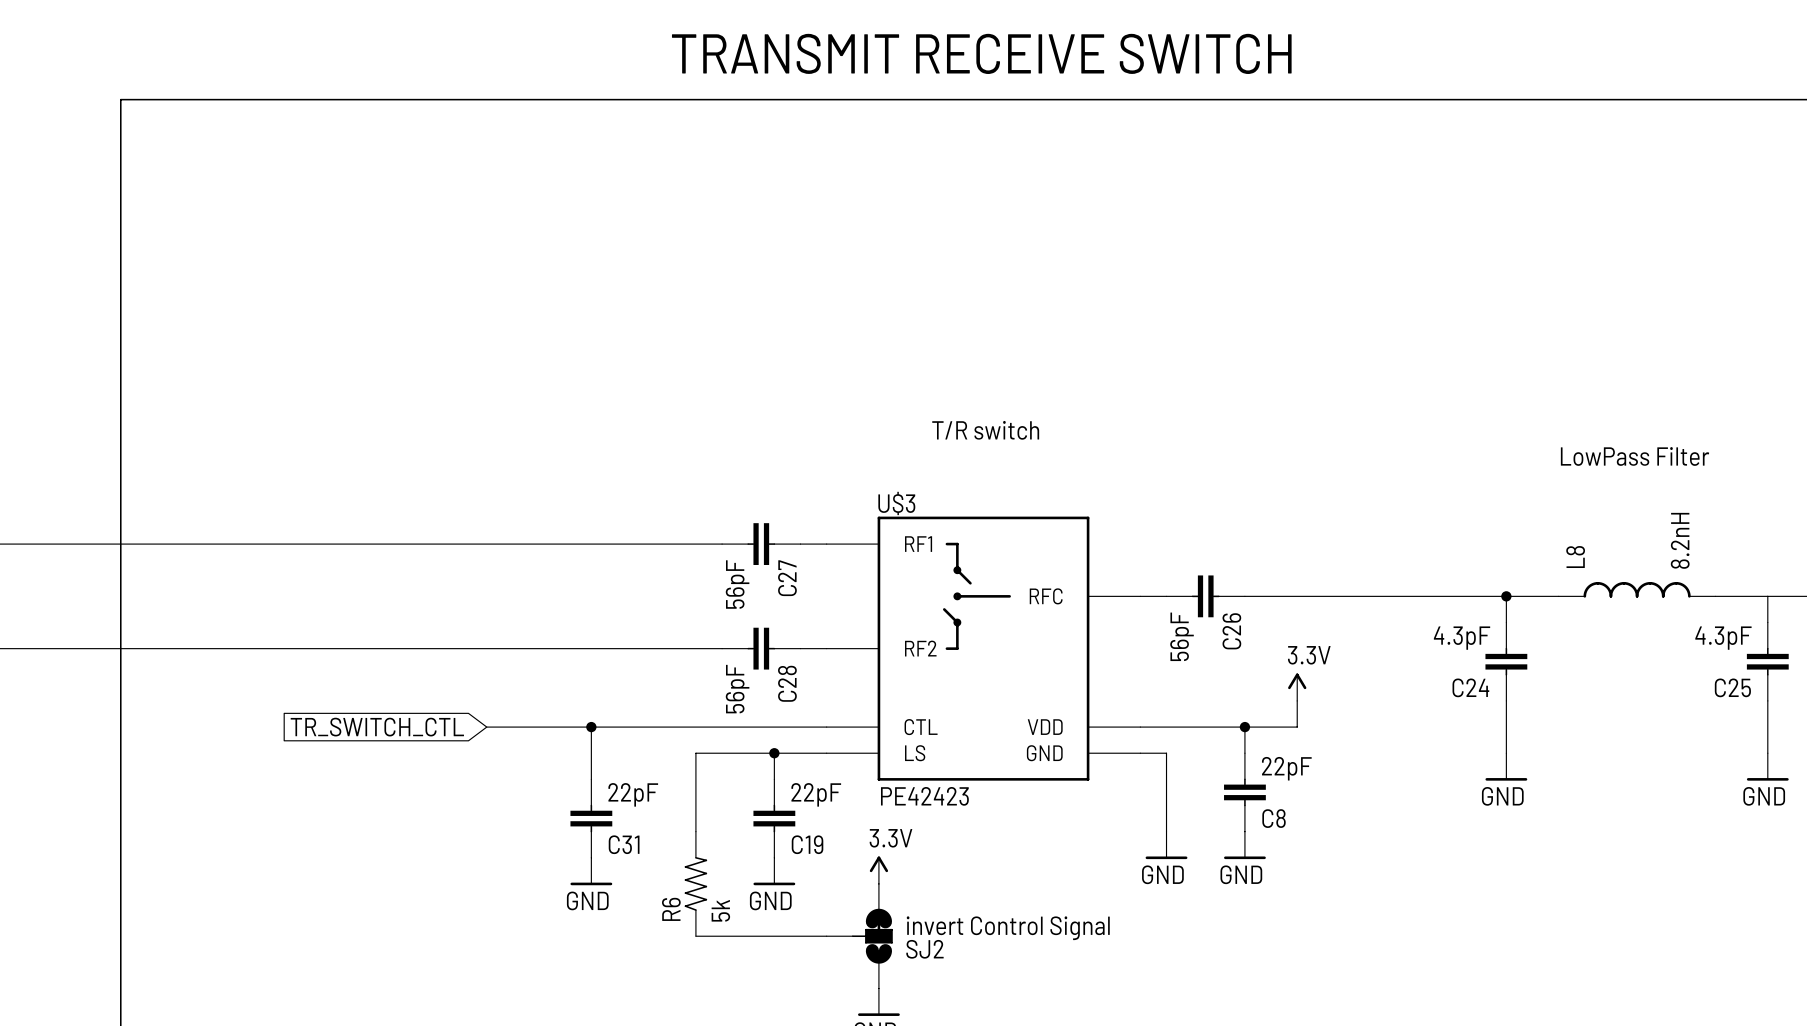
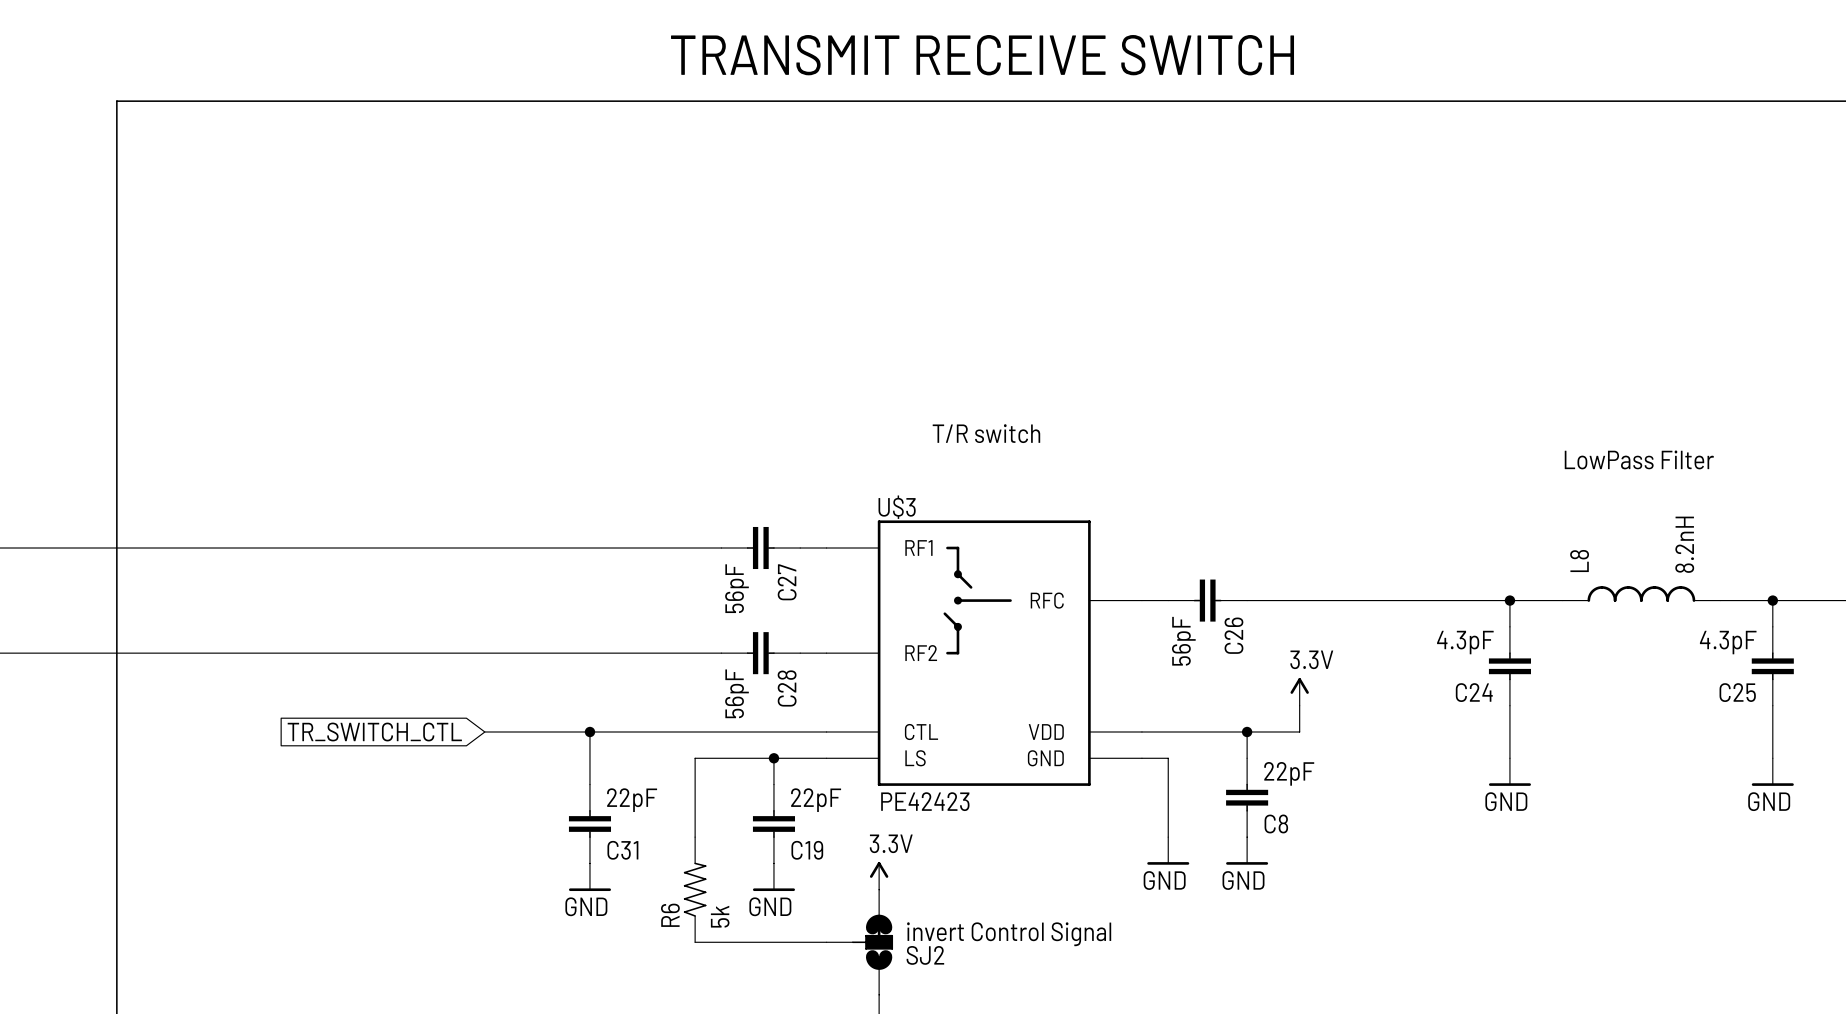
junction: none -> (1772, 600)

